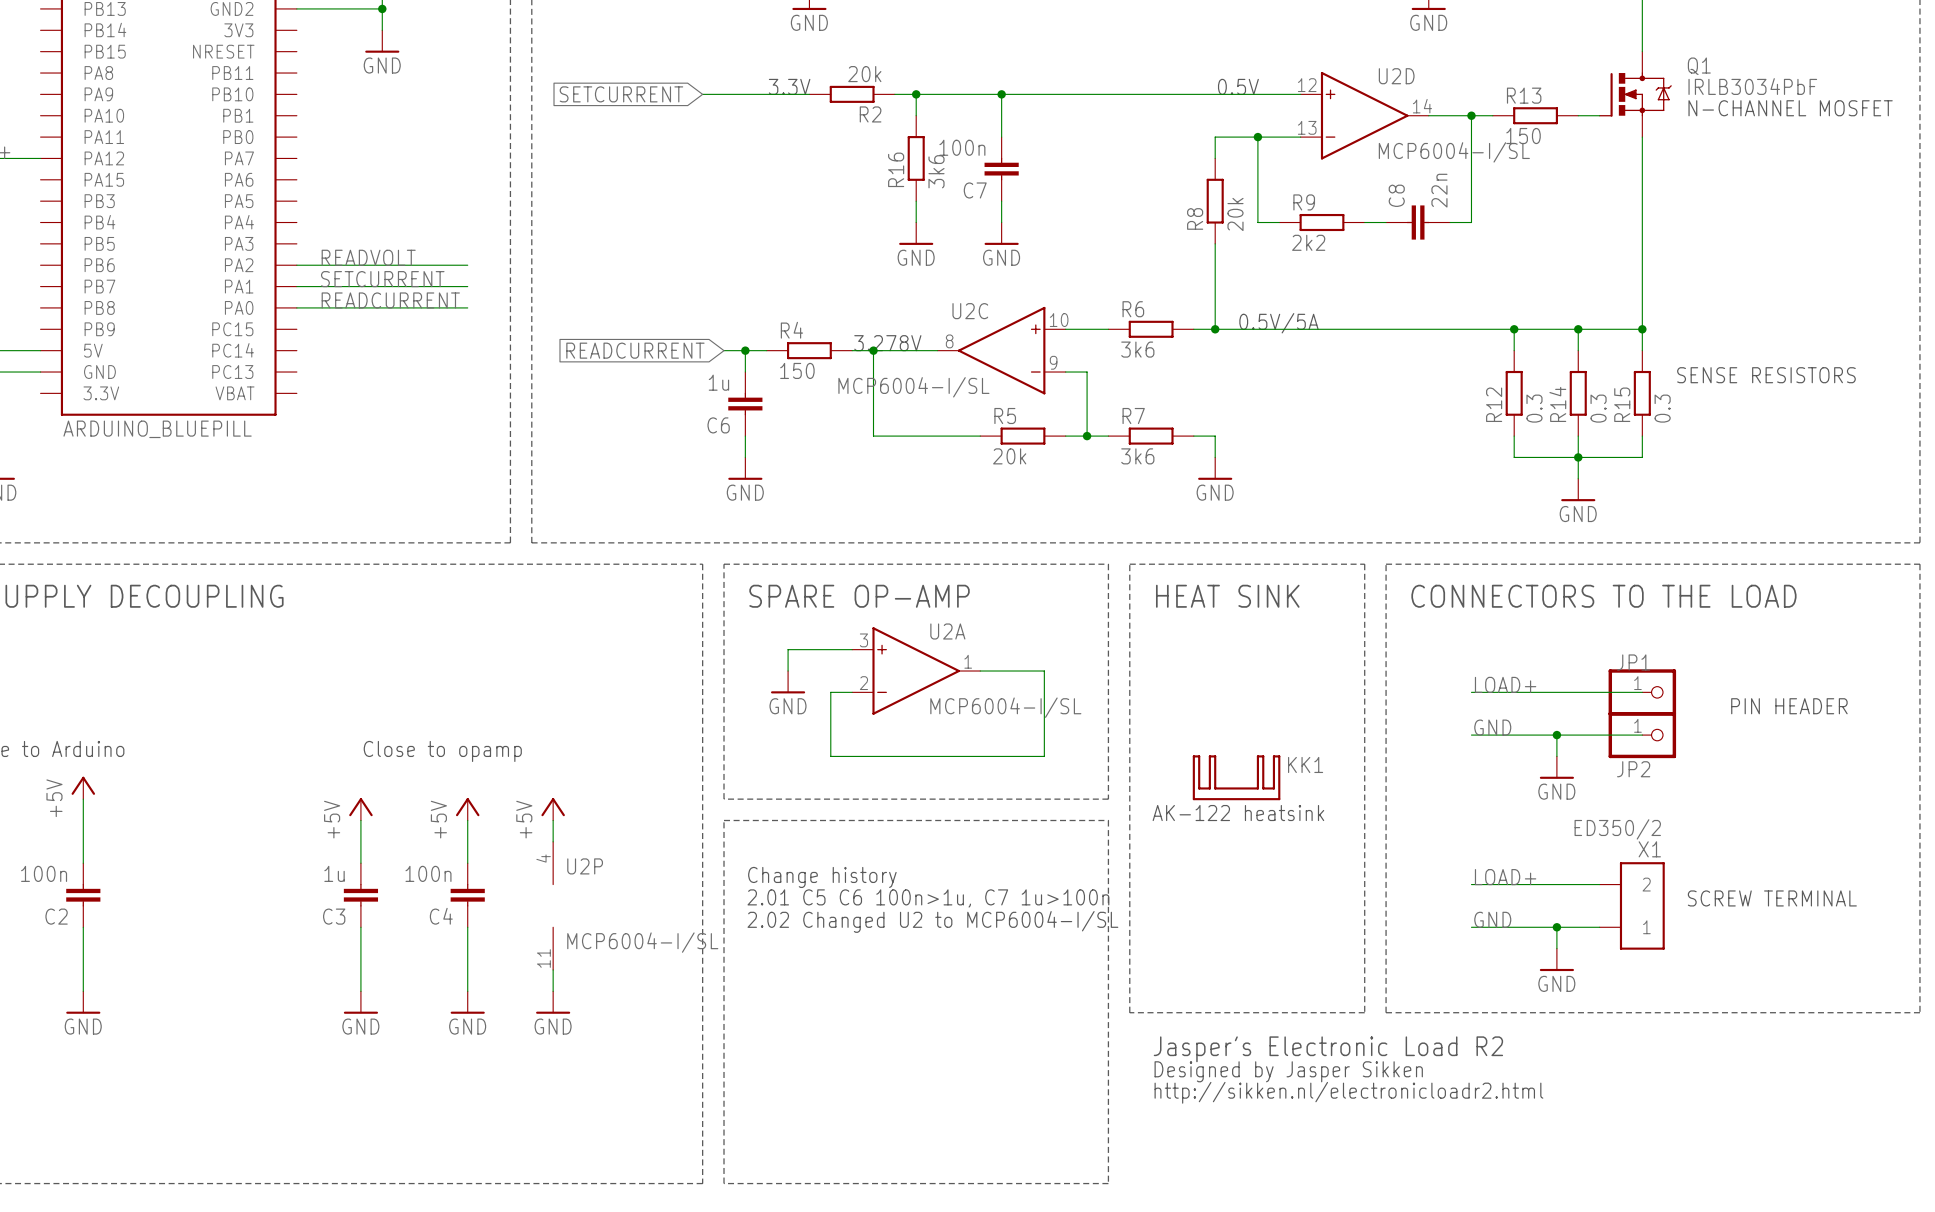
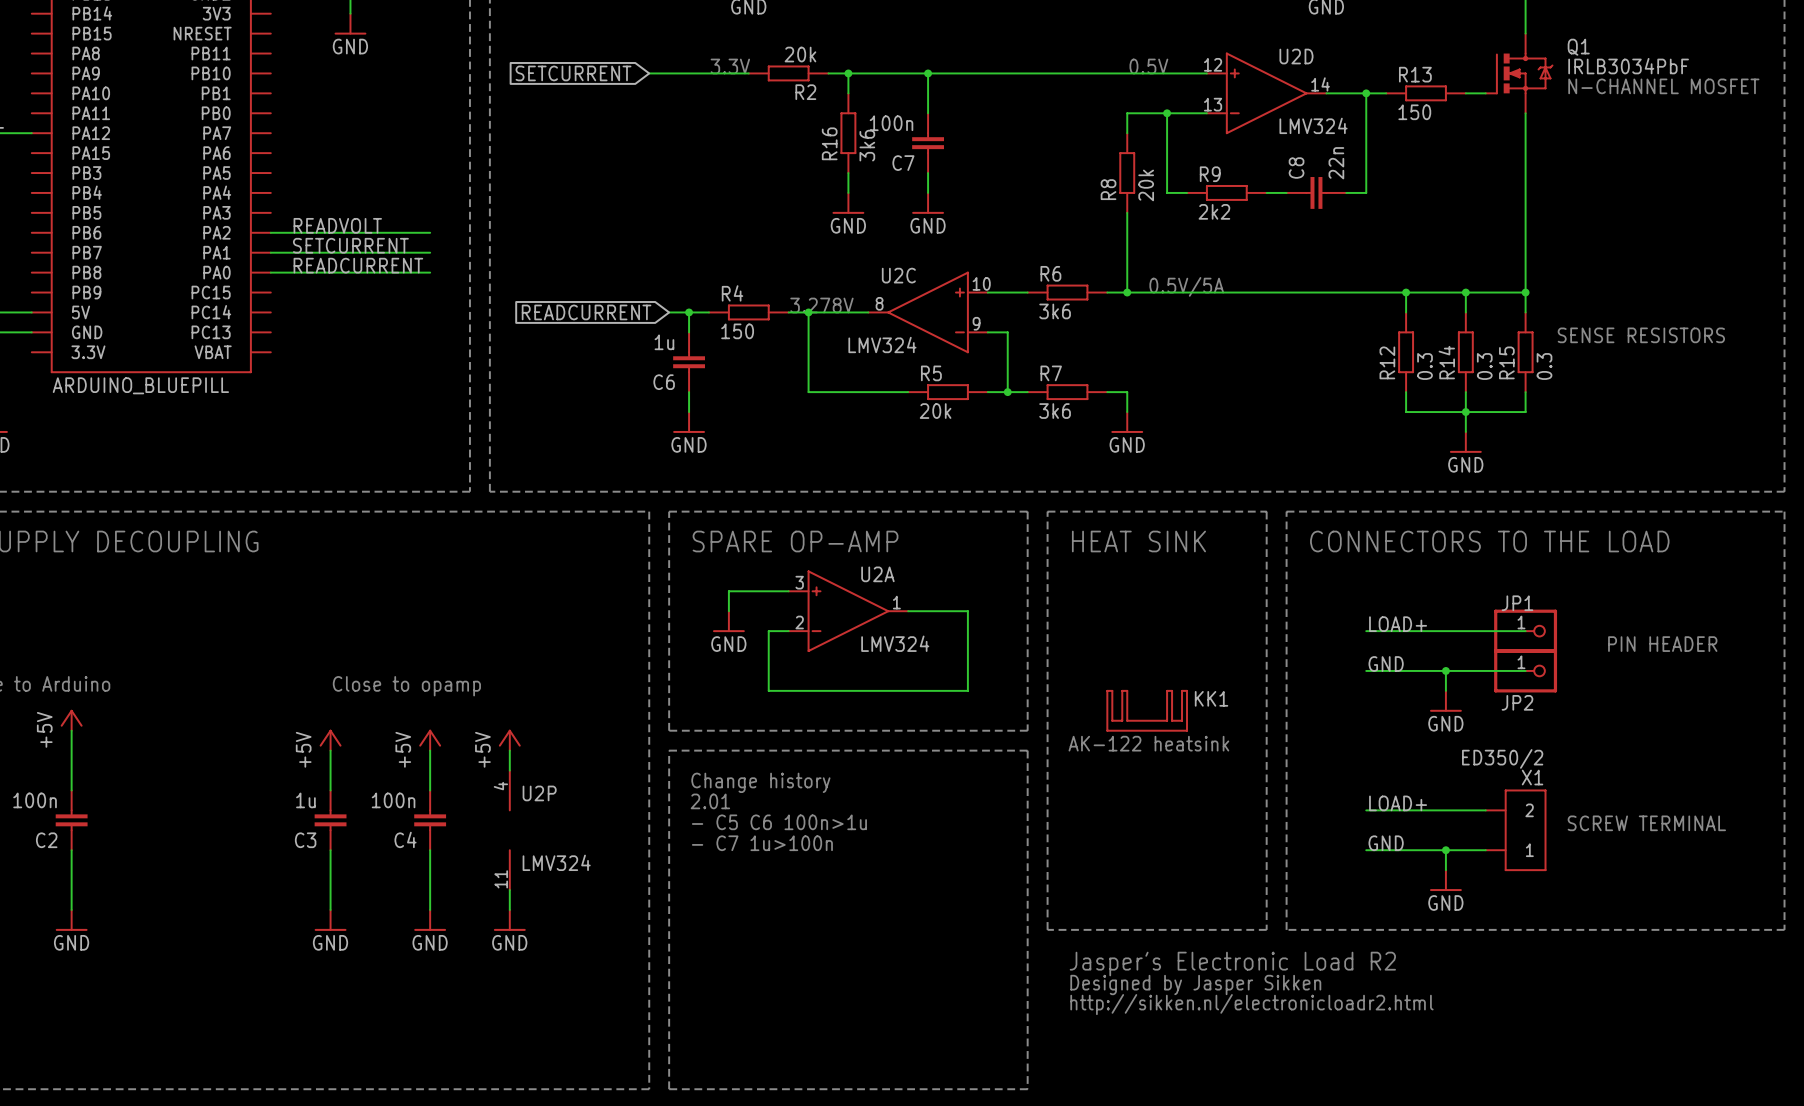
U2D value: MCP6004-I/SL (1454, 152) -> LMV324 (1313, 125)
U2C value: MCP6004-I/SL (913, 387) -> LMV324 (882, 344)
U2A value: MCP6004-I/SL (1005, 707) -> LMV324 (895, 643)
text: none -> Change history (760, 782)
text: Change history (822, 877) -> 2.01 (710, 801)
text: 2.01 C5 C6 100n>1u, C7 1u>100n (928, 898) -> - C5 C6 100n>1u (779, 822)
text: 2.02 Changed U2 to MCP6004-I/SL (932, 921) -> - C7 1u>100n (762, 843)
U2P value: MCP6004-I/SL (642, 942) -> LMV324 (556, 862)

